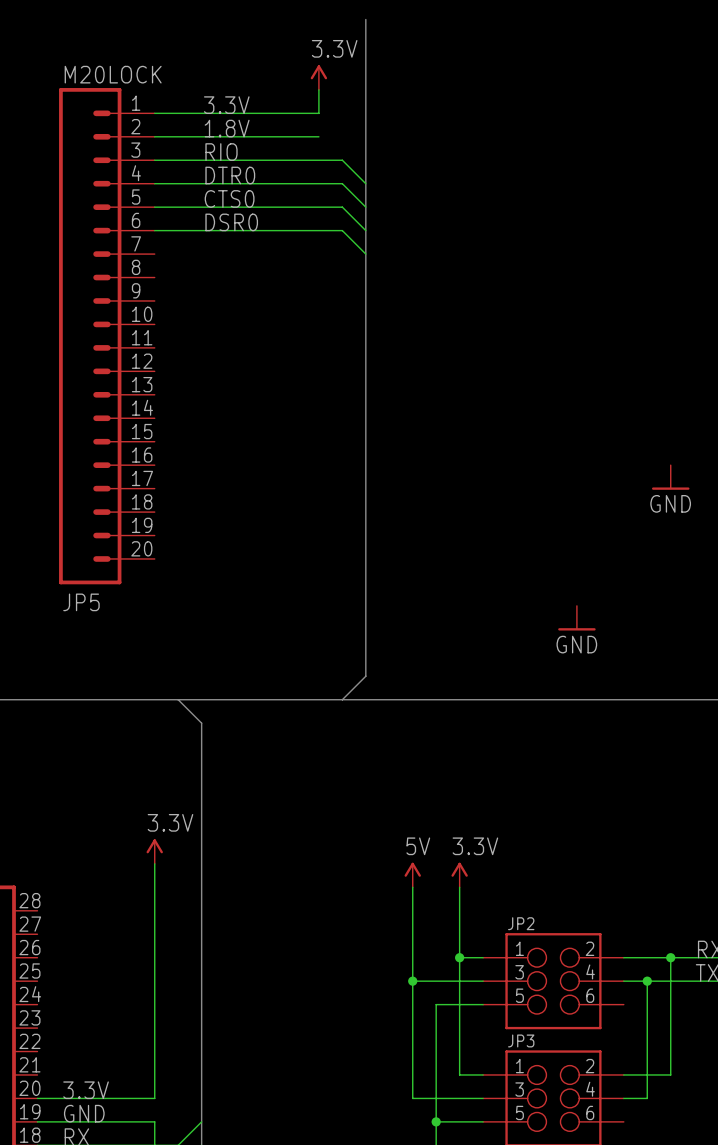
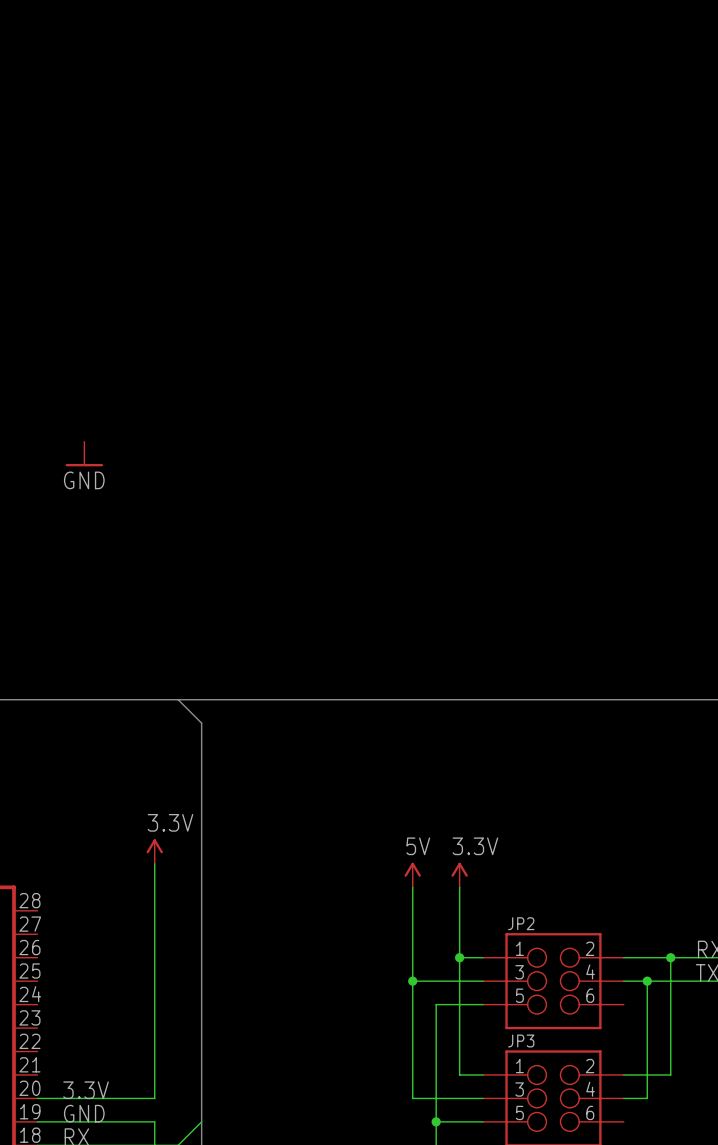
bus: (365, 19) (365, 676) (342, 699) -> none
power symbol: 3.3V (318, 77) -> none
wire: (318, 89) (318, 113) (154, 113) -> none
label: 3.3V (226, 105) -> none
label: 1.8V (227, 128) -> none
wire: (154, 136) (318, 136) -> none
label: RIO (221, 152) -> none
wire: (154, 160) (342, 160) (365, 183) -> none
label: DTR0 (230, 175) -> none
wire: (154, 183) (342, 183) (365, 207) -> none
label: CTS0 (229, 198) -> none
wire: (154, 207) (342, 207) (365, 230) -> none
label: DSR0 (231, 222) -> none
wire: (154, 230) (342, 230) (365, 254) -> none
JP5: M20LOCK (106, 336) -> none
power symbol: none -> GND (84, 454)
power symbol: GND (670, 477) -> none
power symbol: GND (576, 618) -> none

